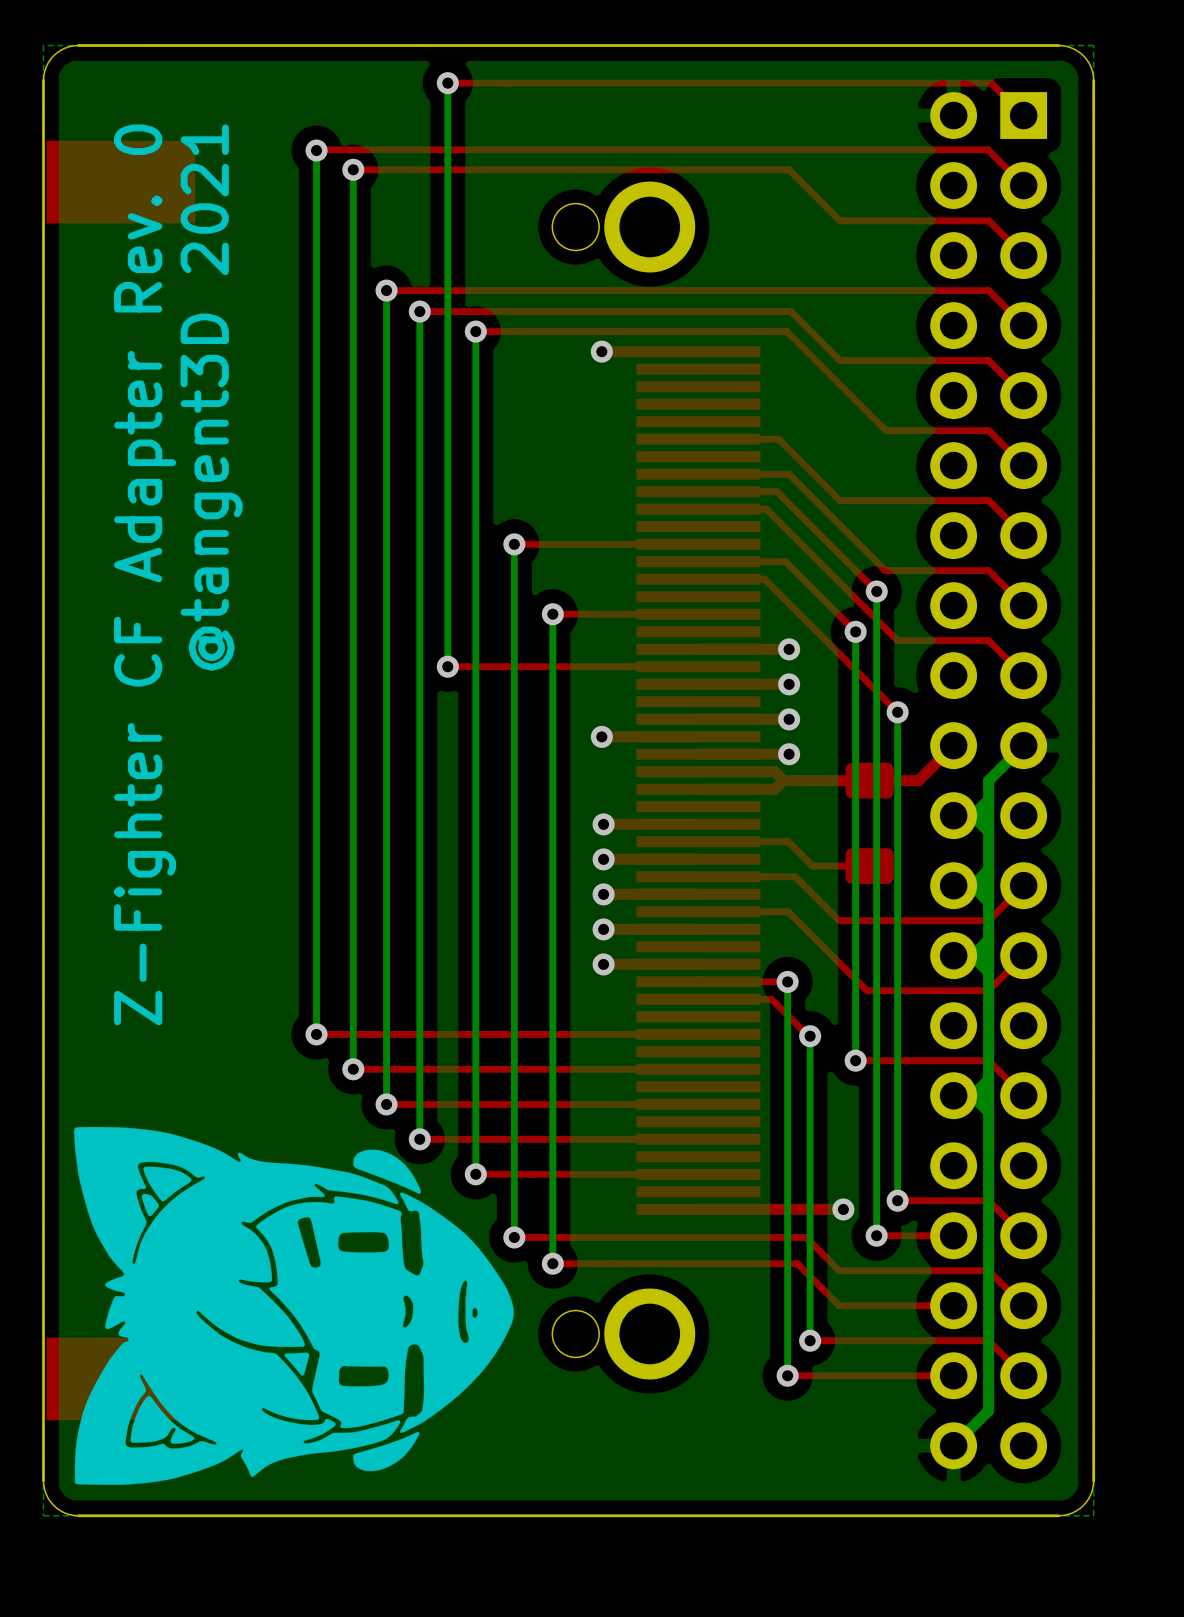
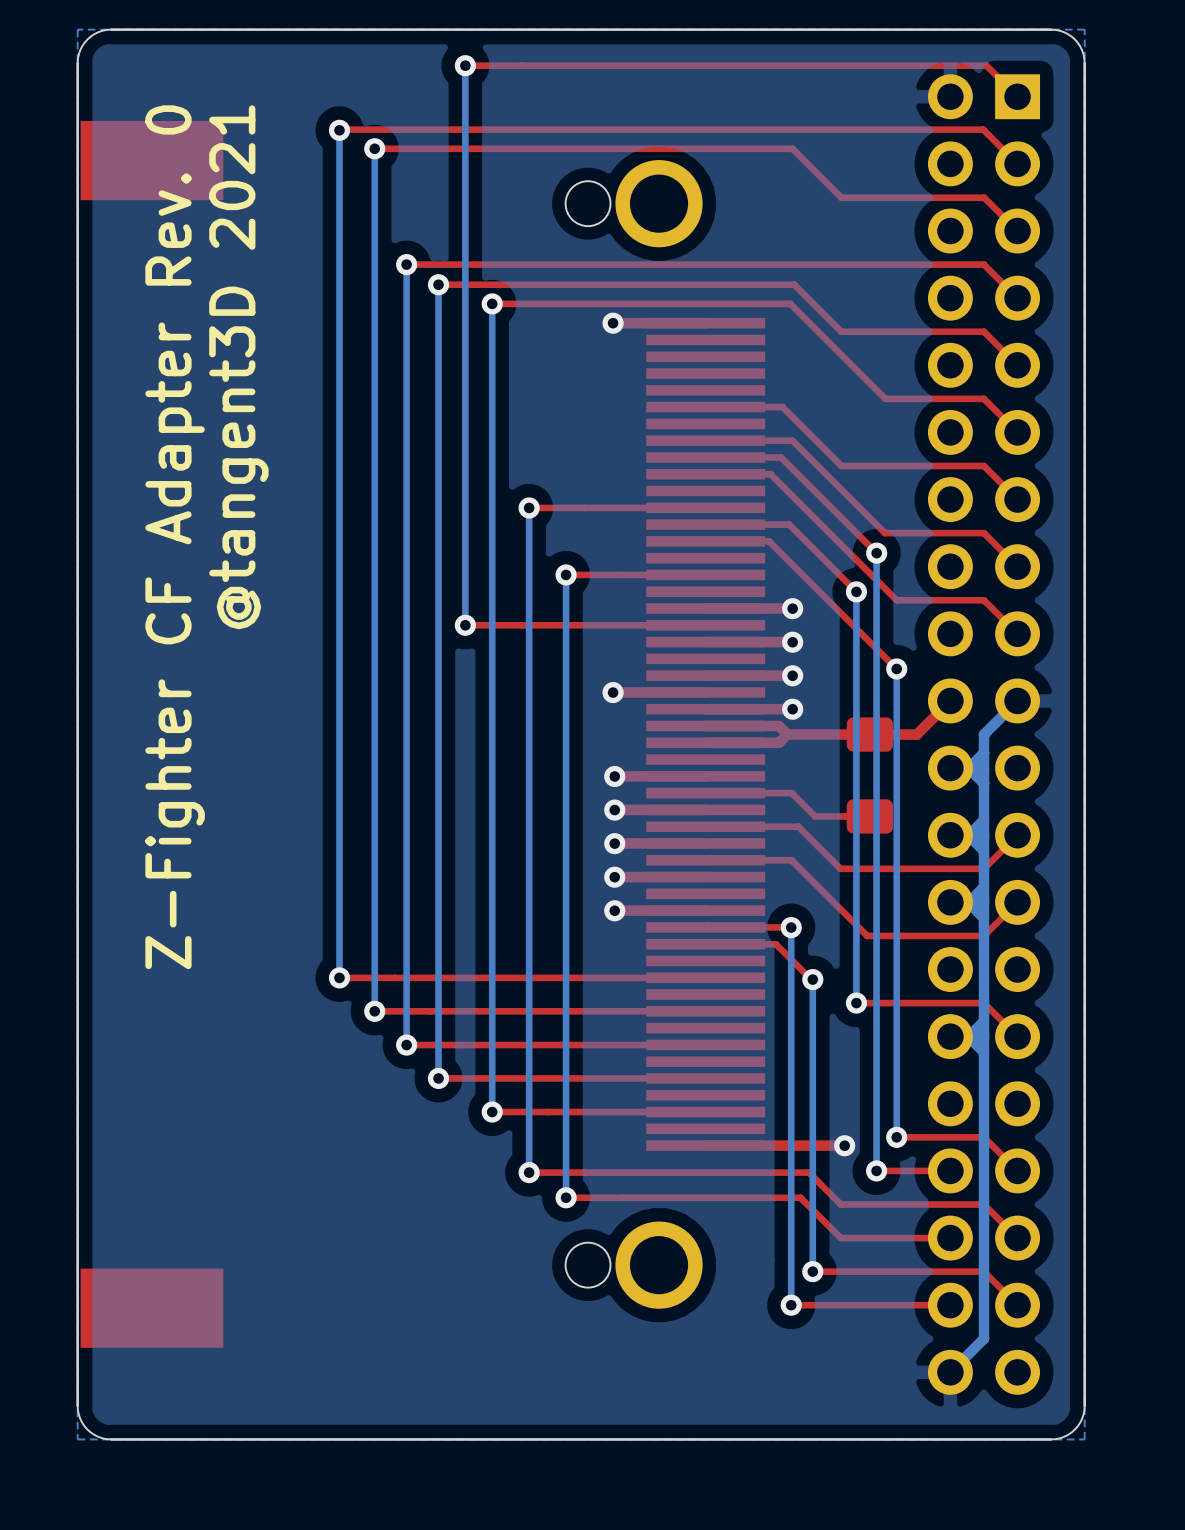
drawing: [74, 1126, 514, 1485] -> none

